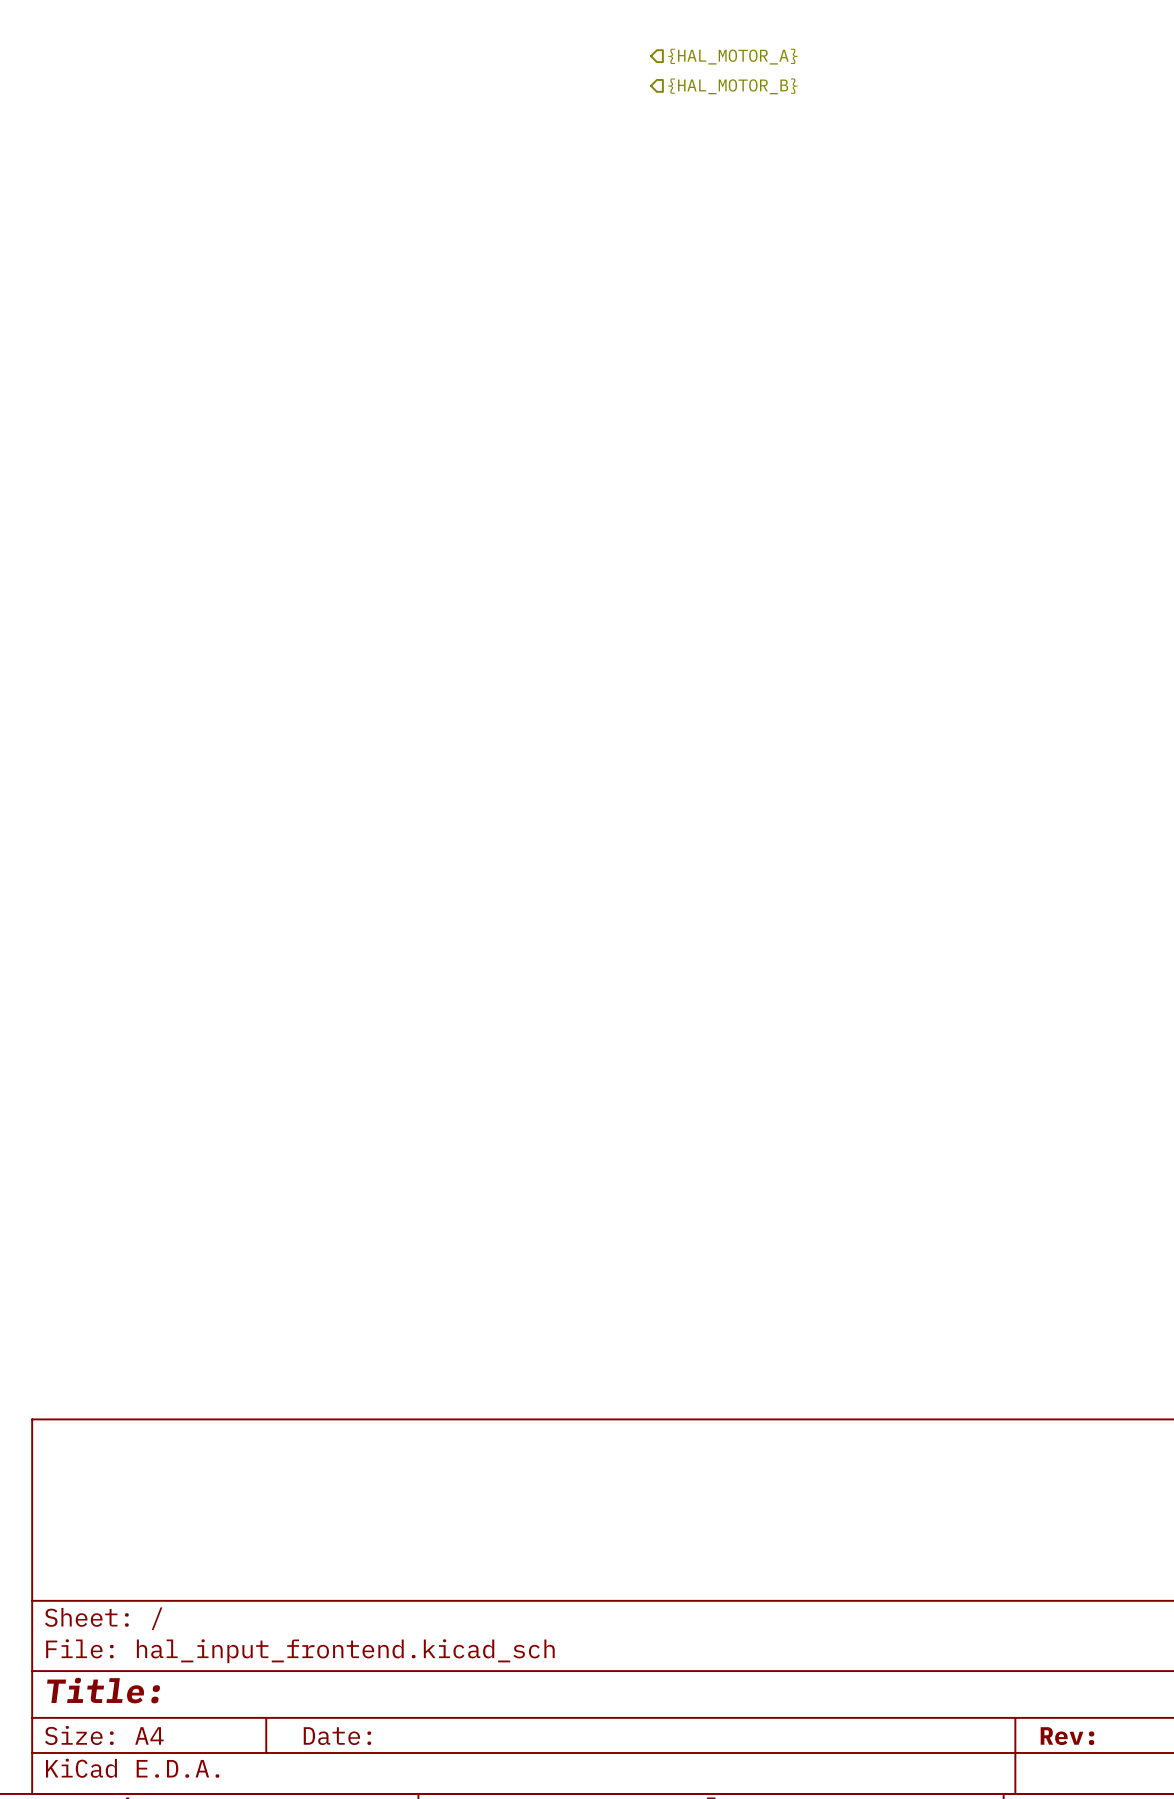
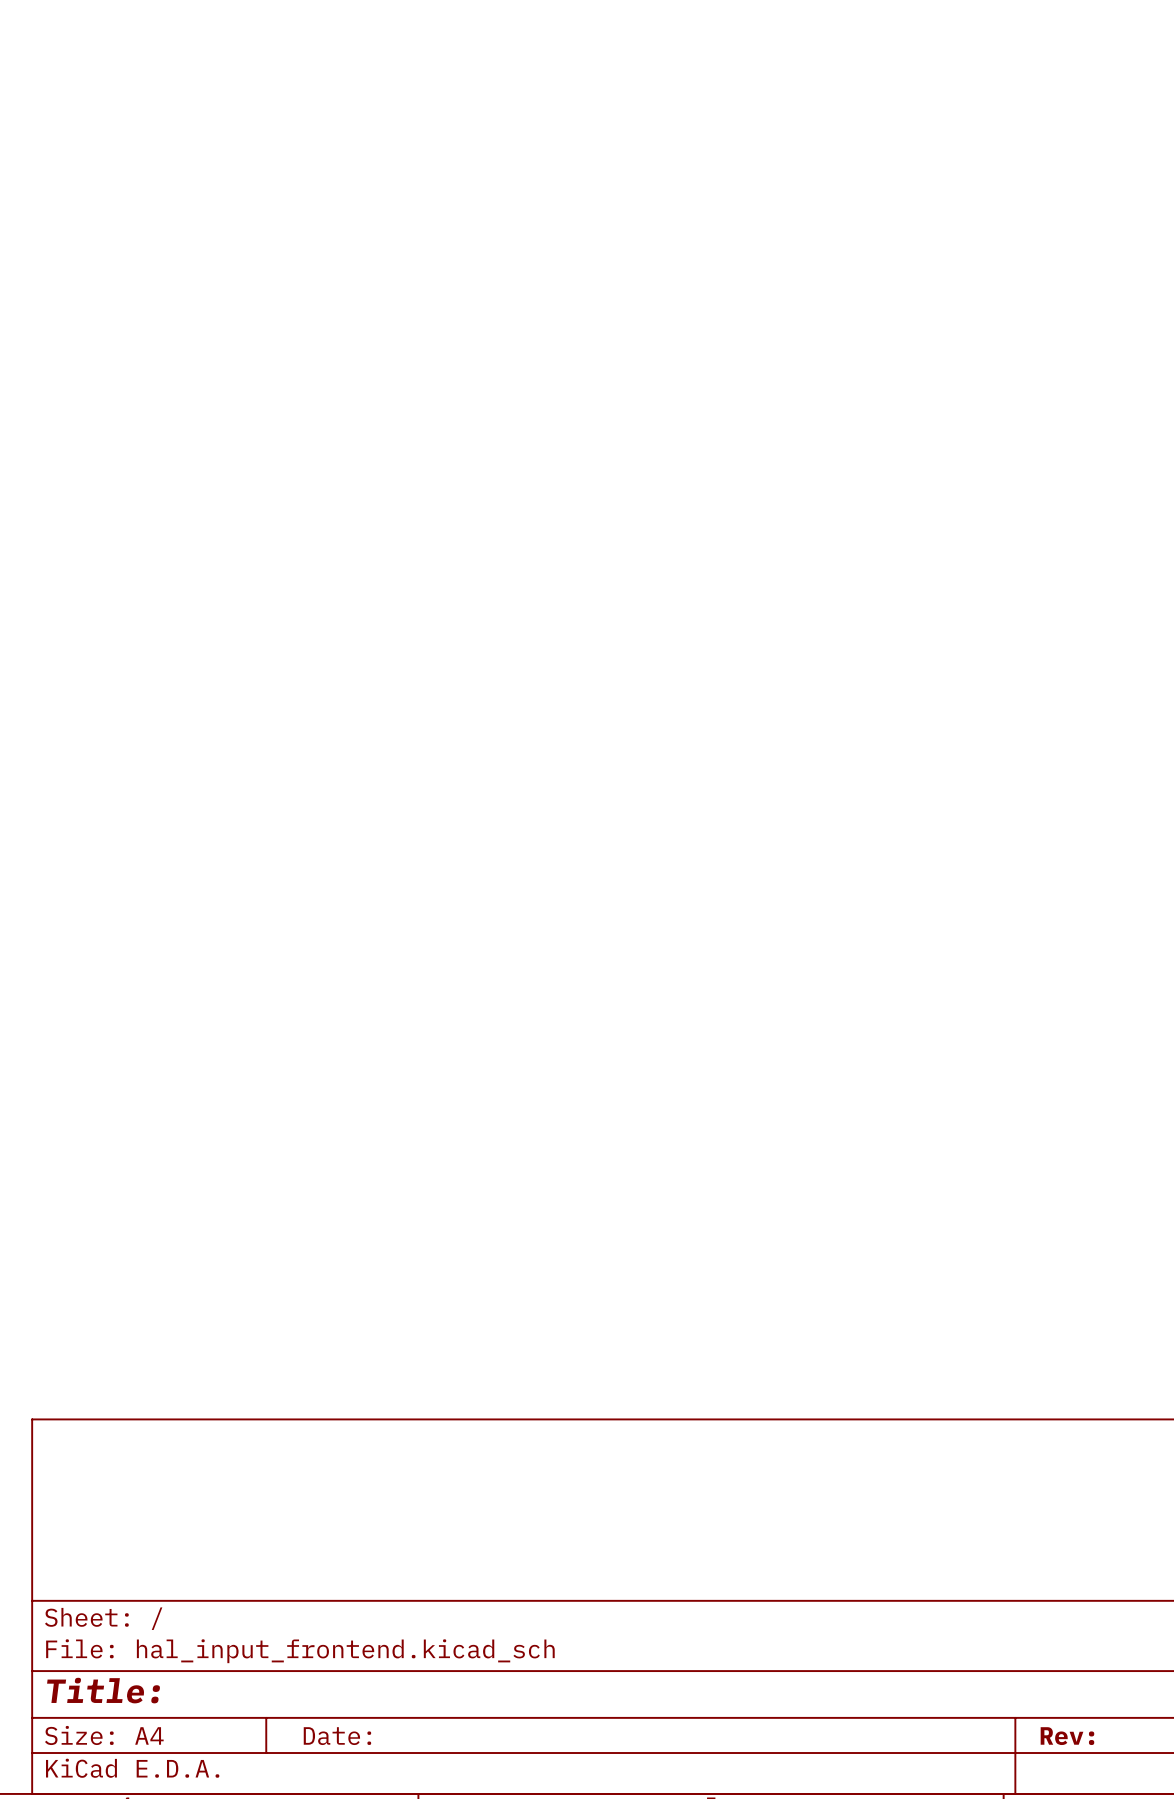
hierarchical label: {HAL_MOTOR_A} (732, 56) -> none
hierarchical label: {HAL_MOTOR_B} (732, 86) -> none

